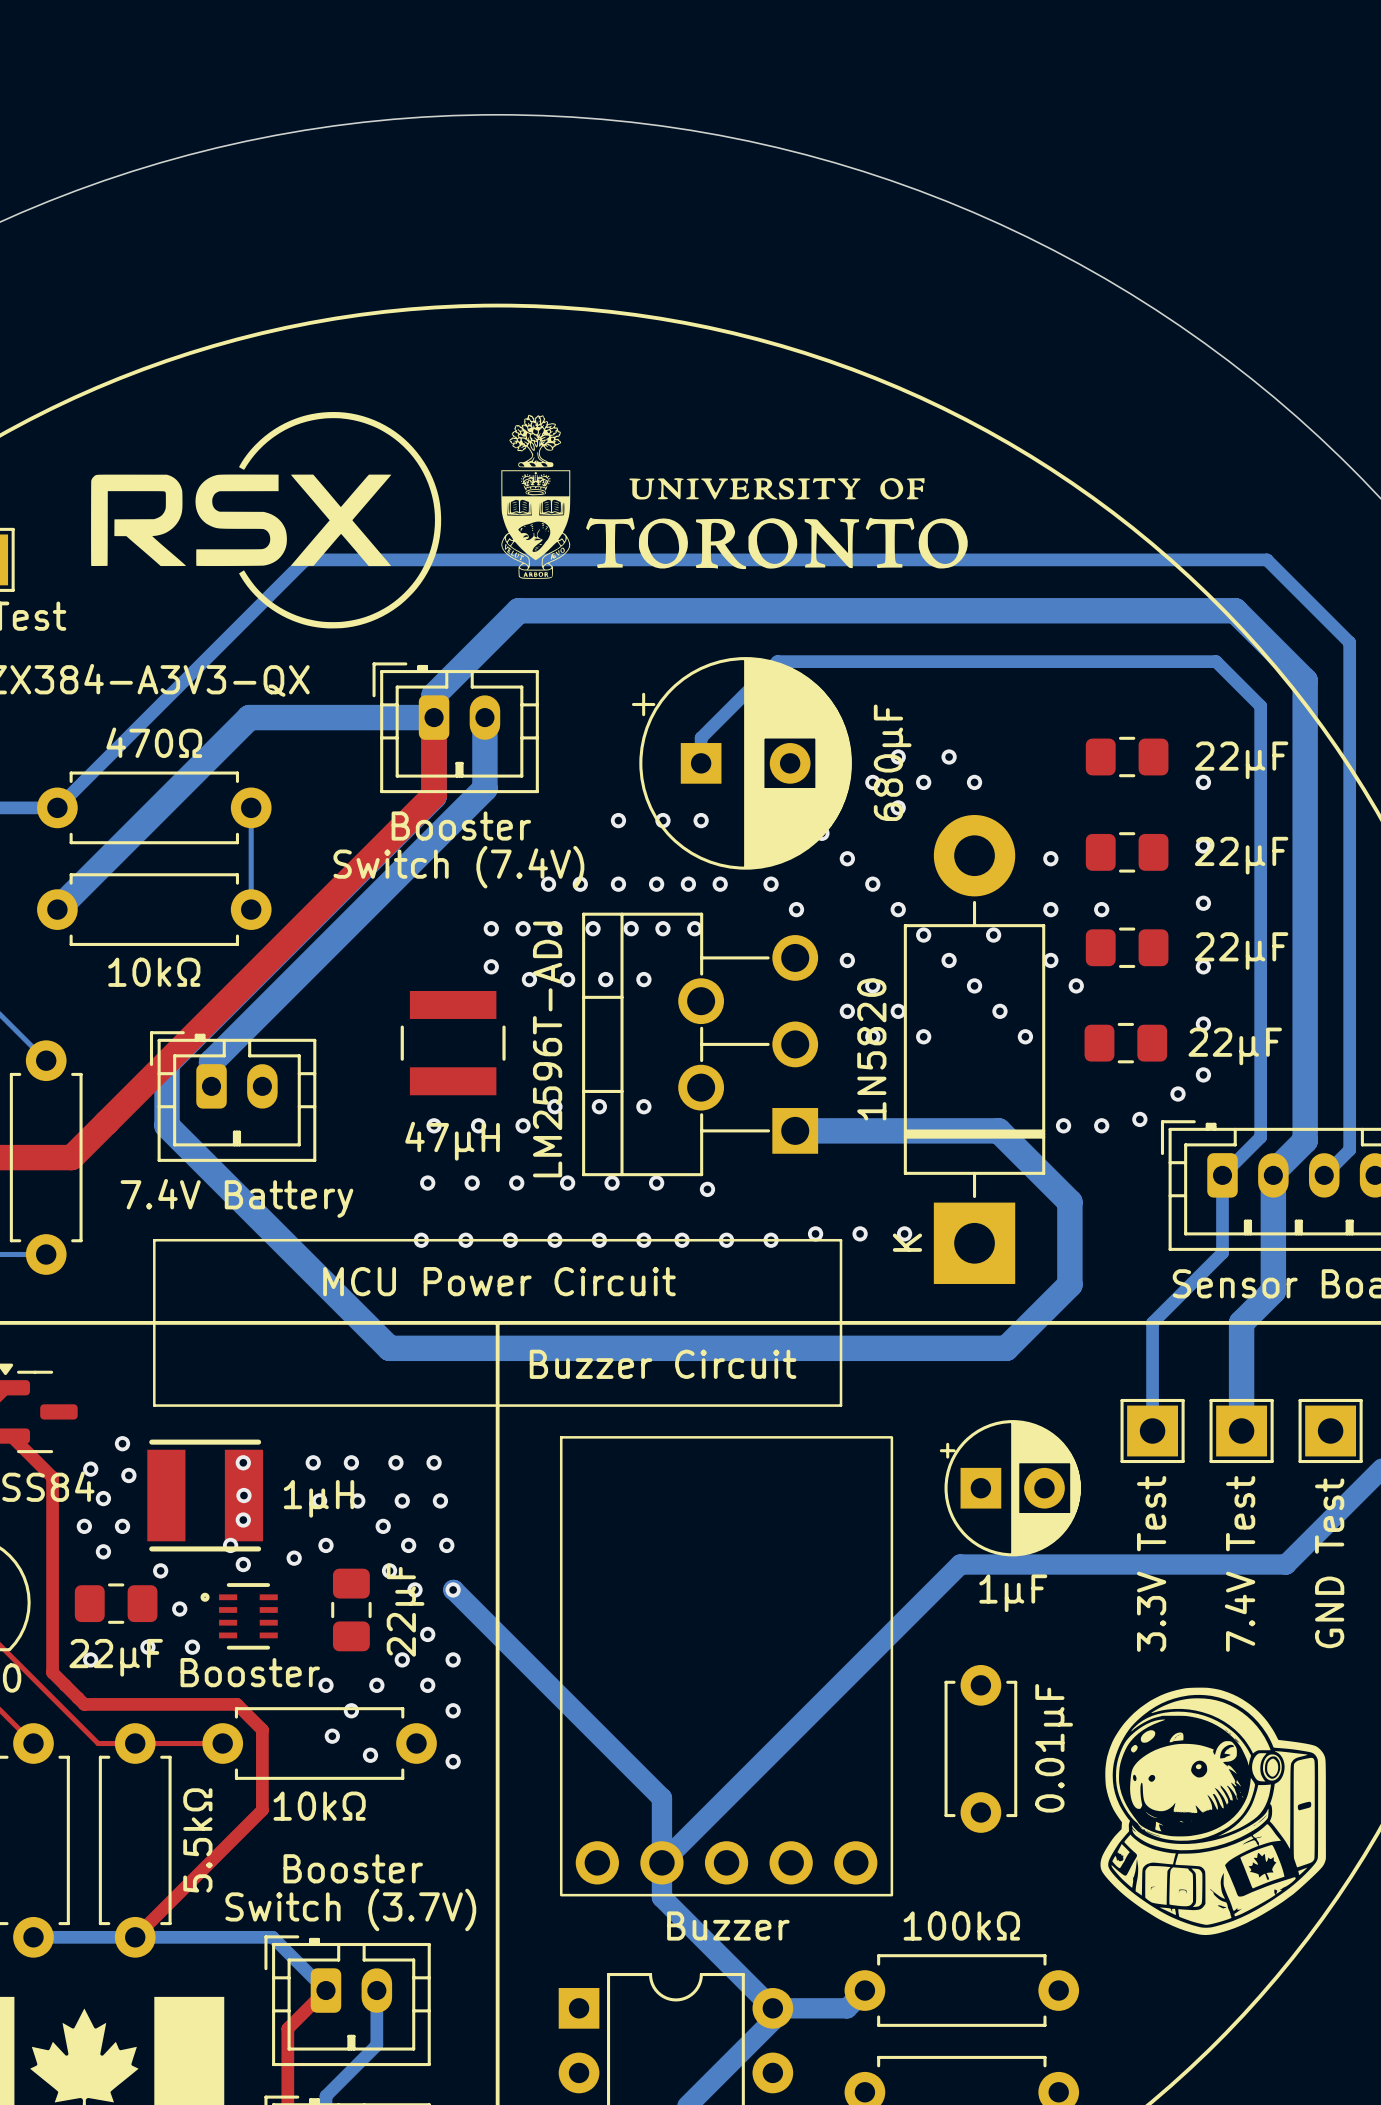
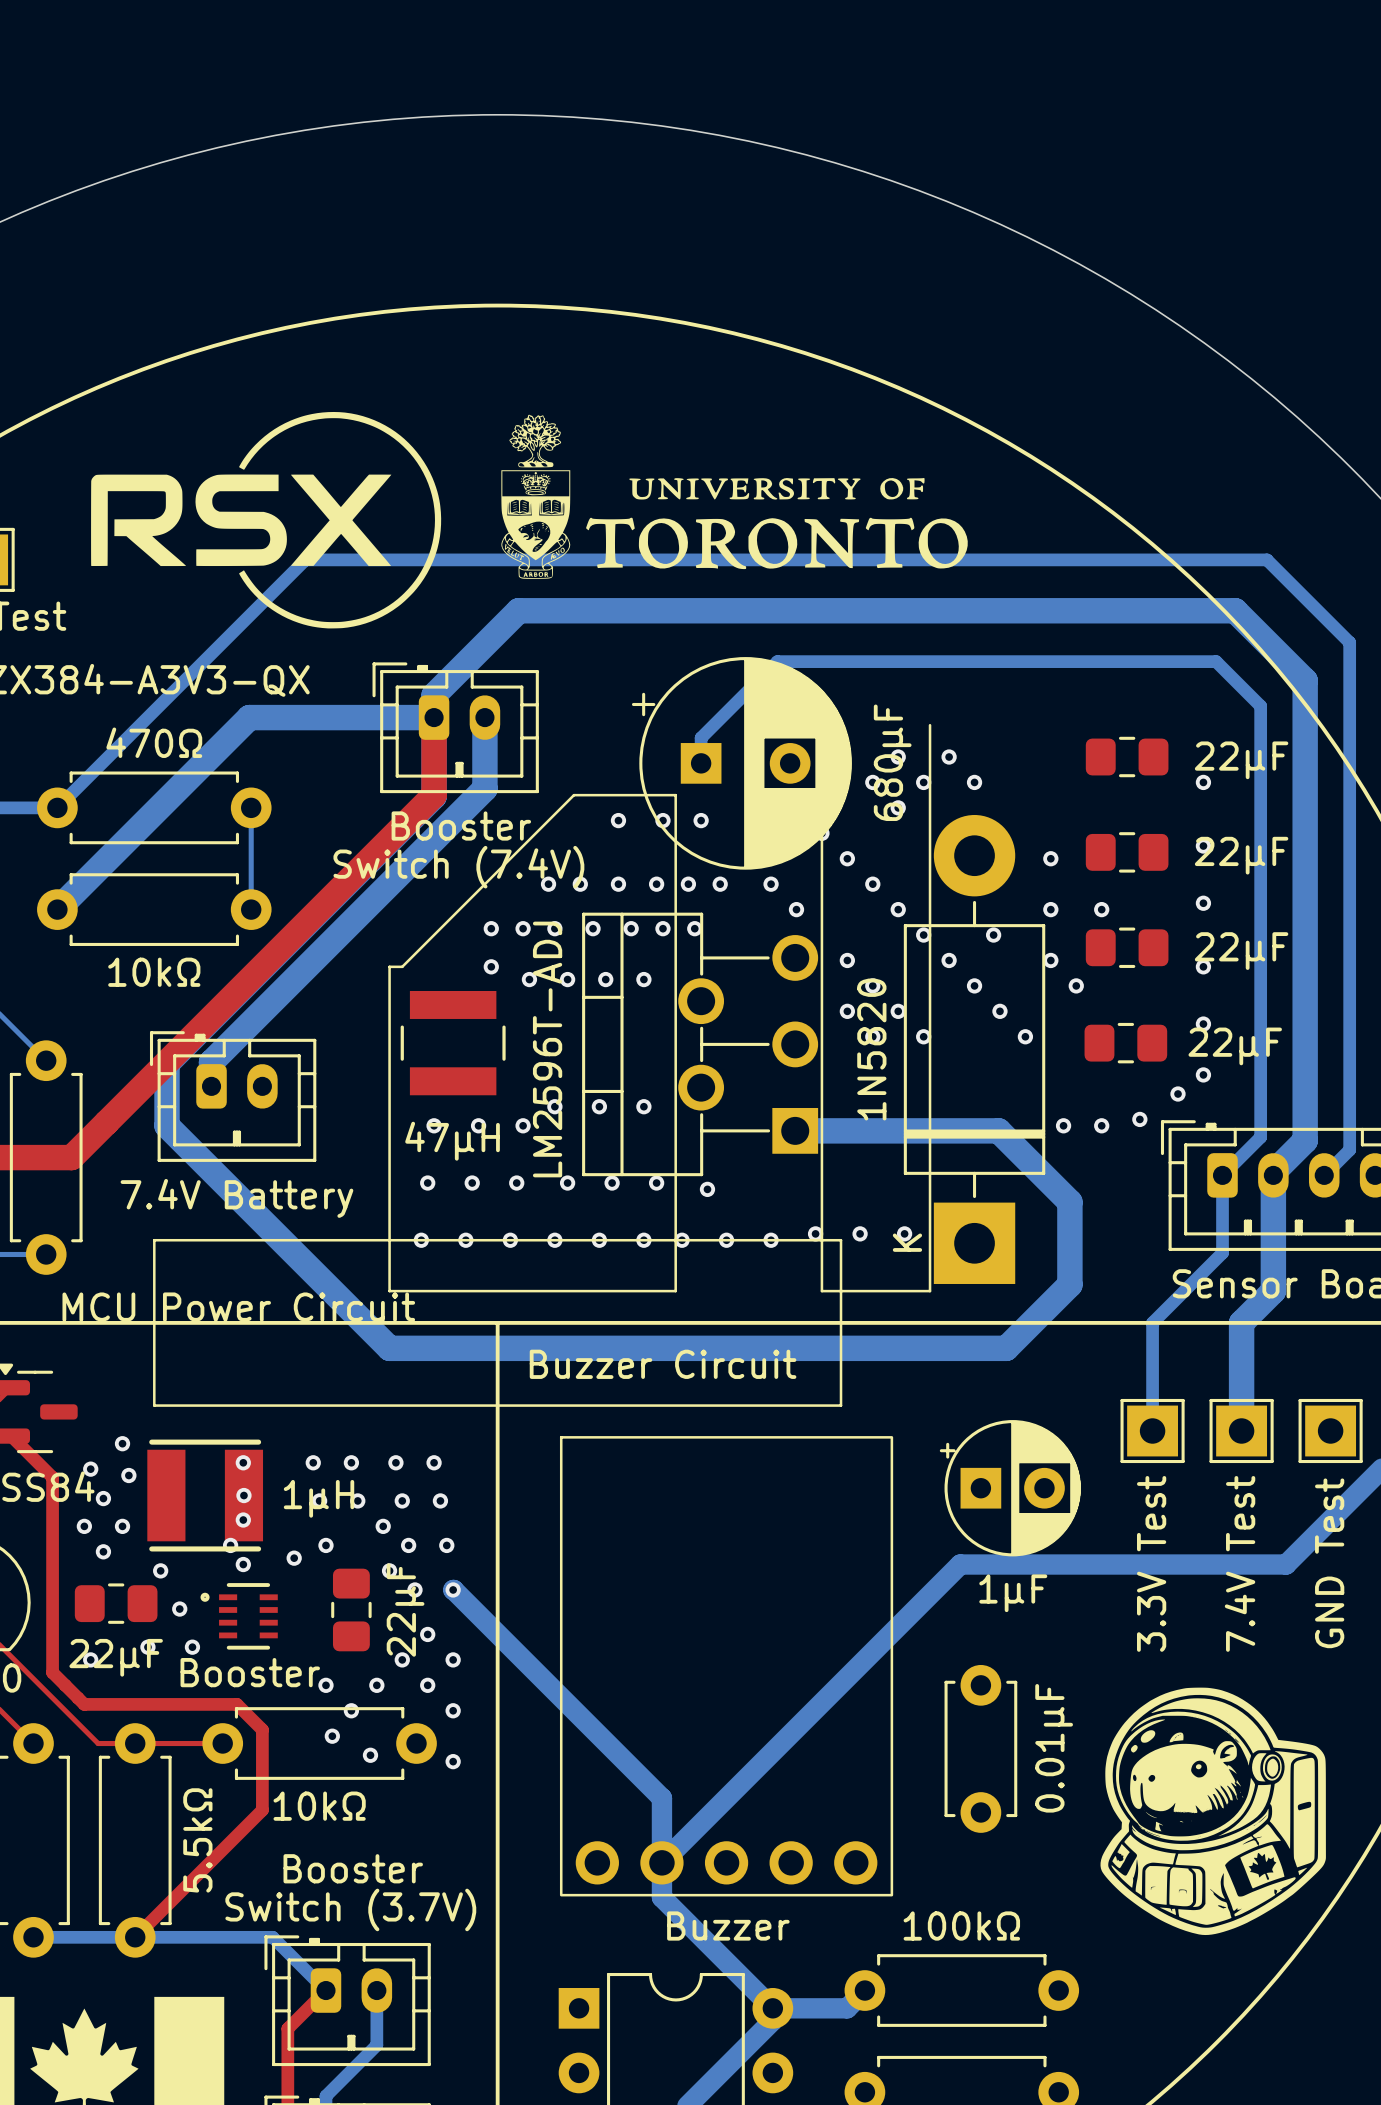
line: none -> (821, 725) (821, 1291) (930, 1291) (930, 725)
line: none -> (573, 795) (402, 966) (389, 966) (389, 1291) (675, 1291) (675, 795) (573, 795)
text position: MCU Power Circuit (499, 1281) -> MCU Power Circuit (238, 1307)

